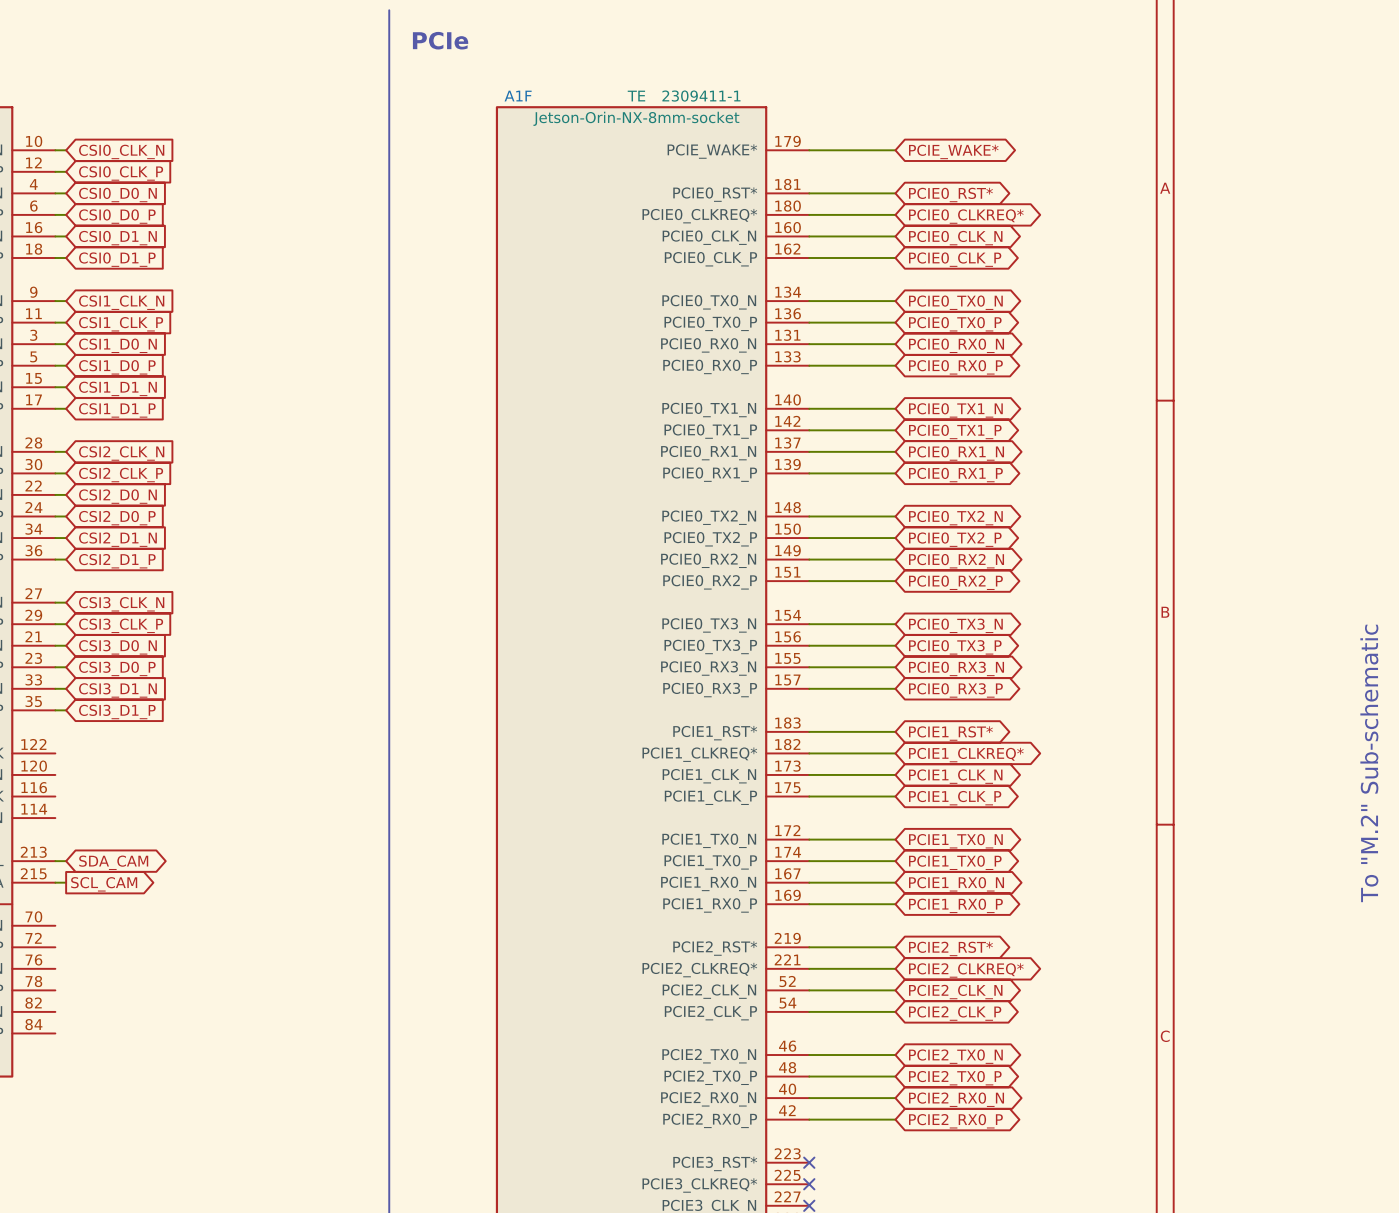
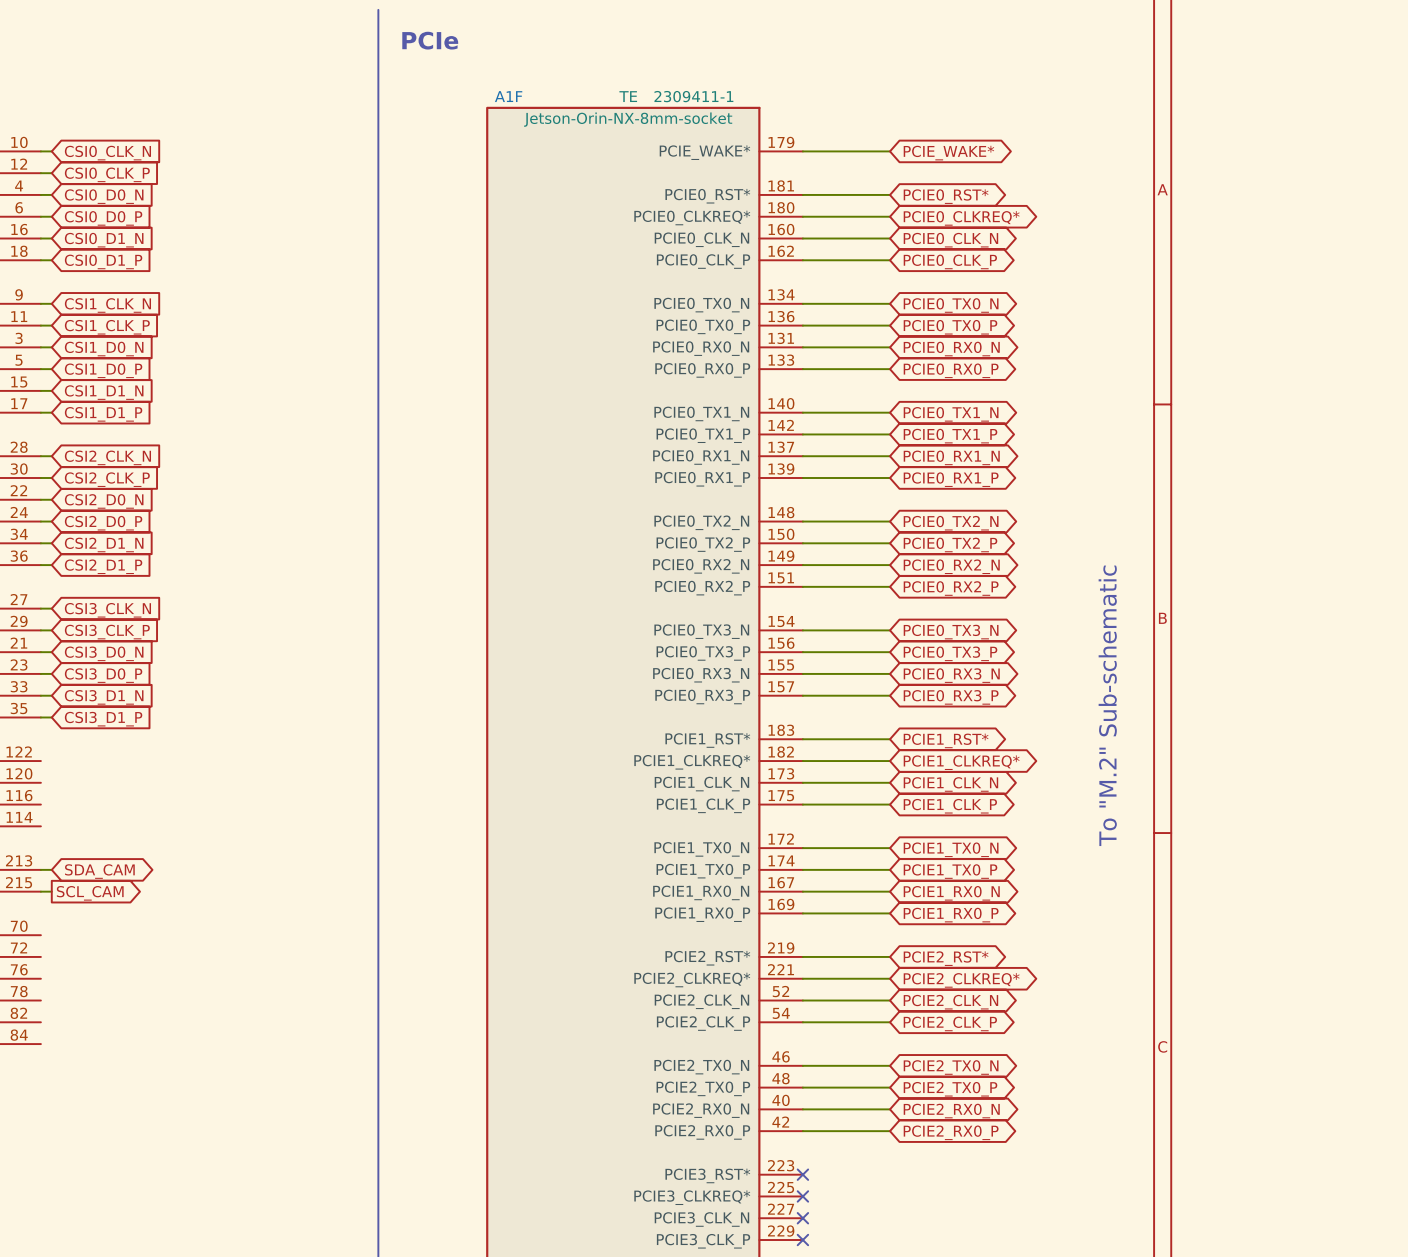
text: none -> To "M.2" Sub-schematic (1107, 705)
text: To "M.2" Sub-schematic (1369, 763) -> none

